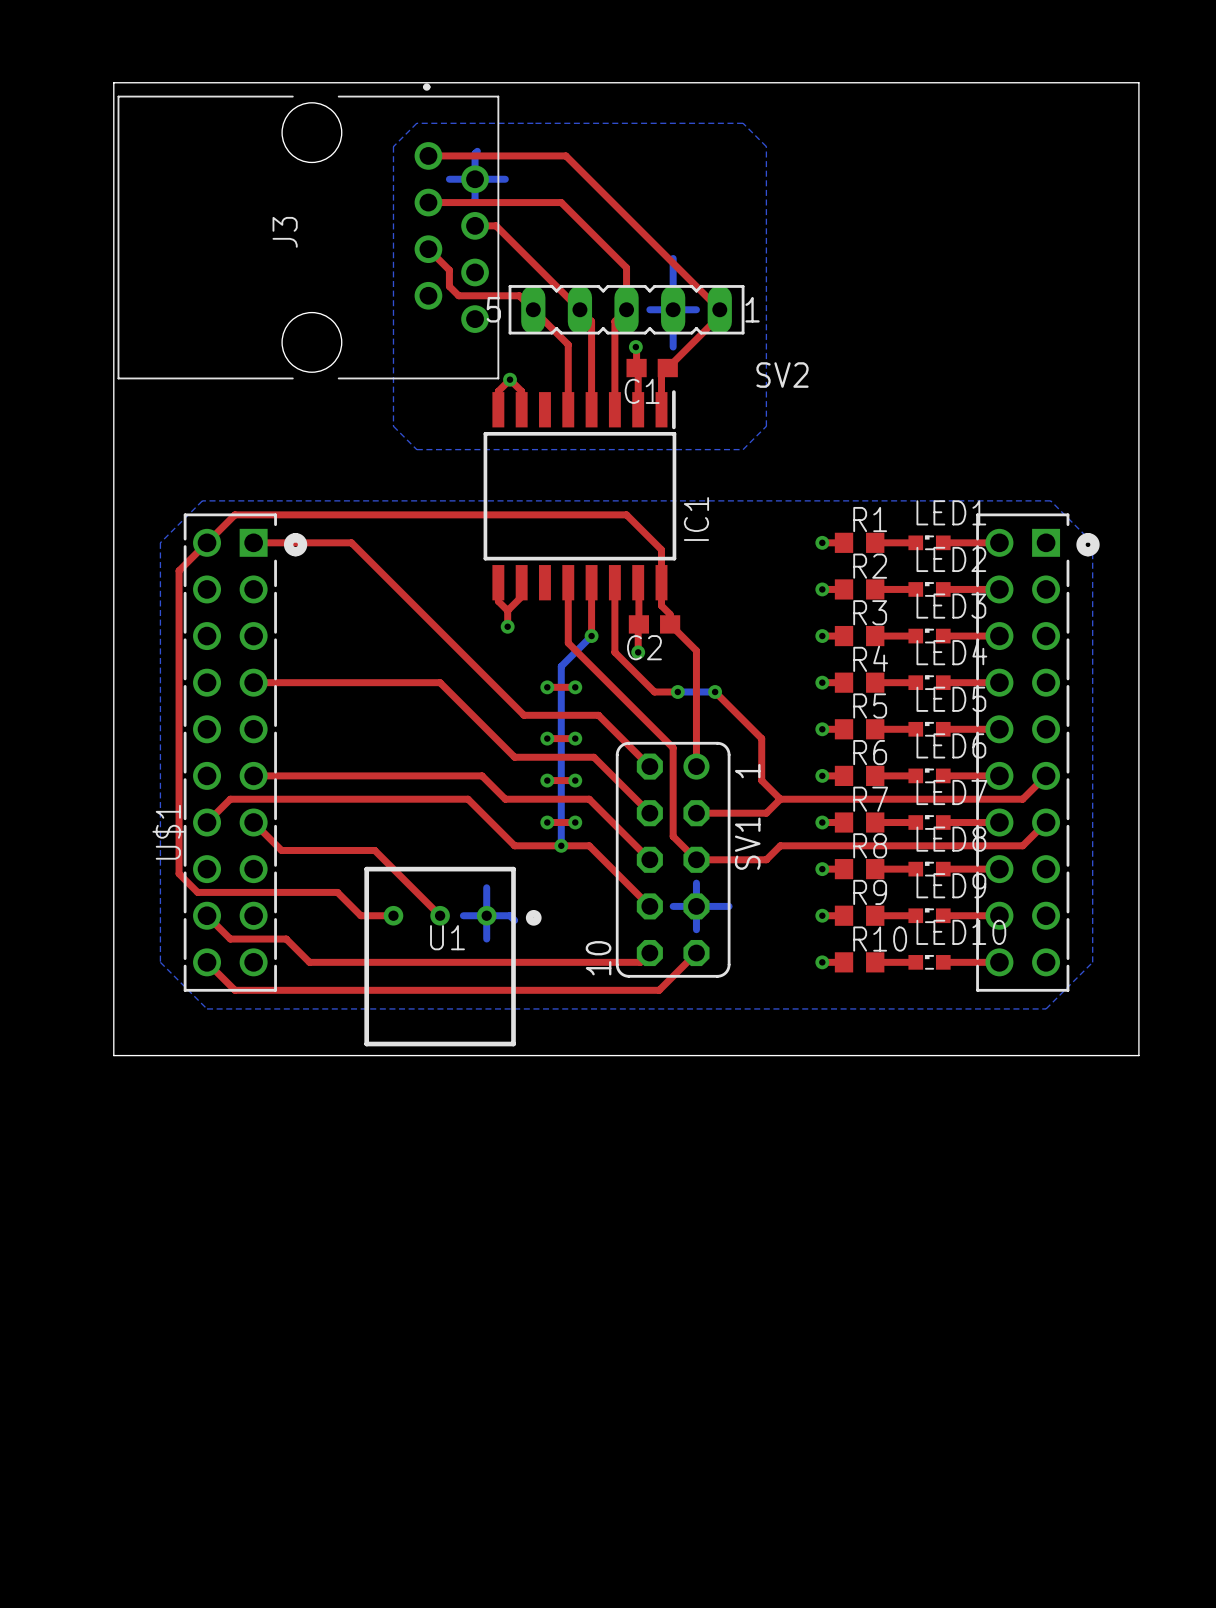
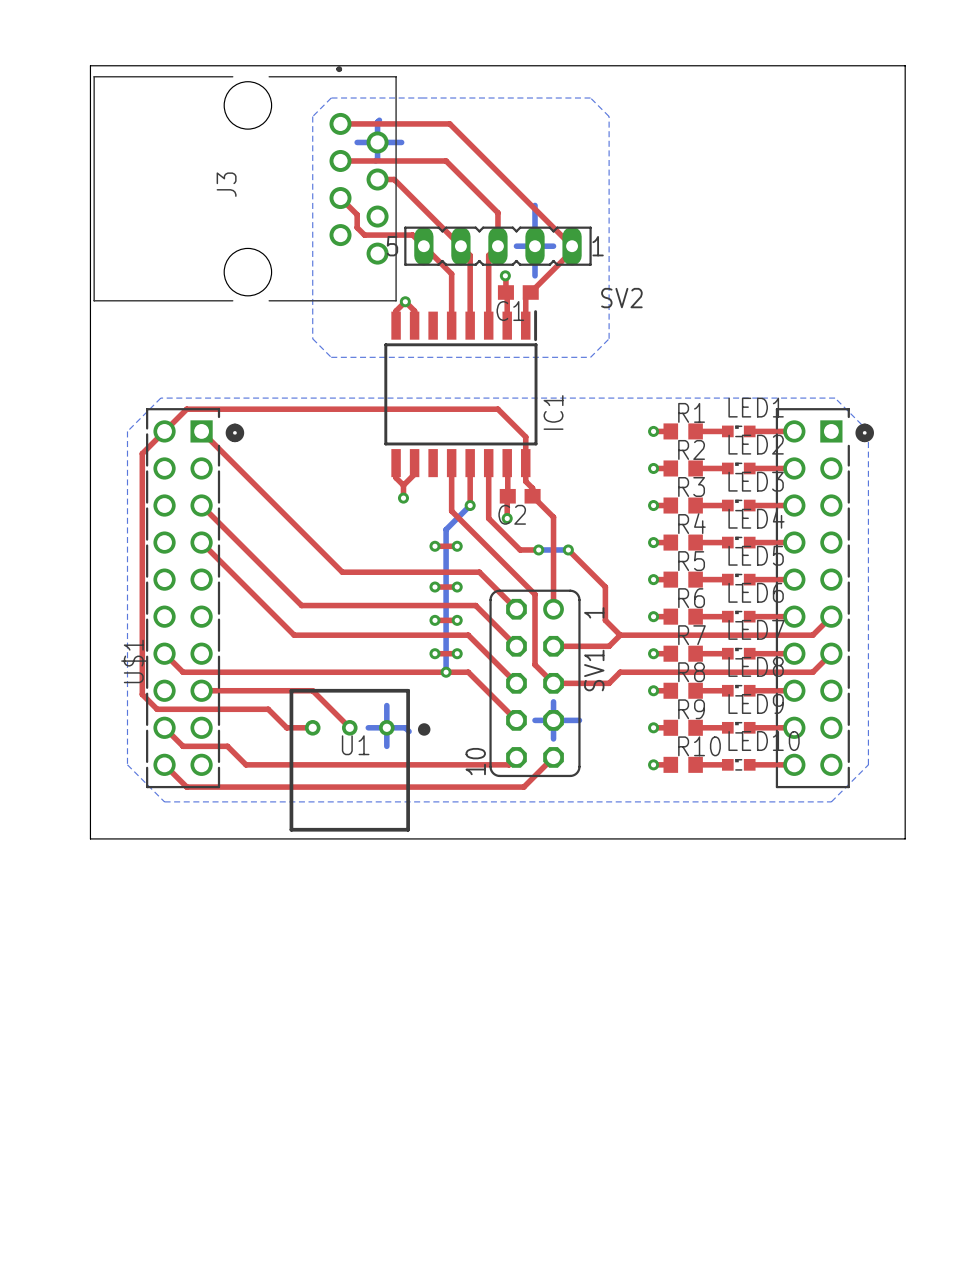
top track: (253, 542) (351, 542) (523, 715) (598, 715) (603, 719) -> (201, 431) (342, 572) (479, 572)
top track: (253, 682) (440, 682) (514, 757) (593, 757) (598, 761) -> (201, 505) (301, 605) (475, 605)
top track: (253, 775) (482, 775) (505, 799) -> none
top track: (370, 799) (230, 799) (207, 822) -> (294, 635) (201, 542)
top track: (468, 799) (514, 845) -> (372, 635) (401, 635)
top track: none -> (164, 653) (183, 672) (409, 672)
top track: (253, 822) (281, 850) (374, 850) (393, 869) -> (201, 690) (312, 690)

